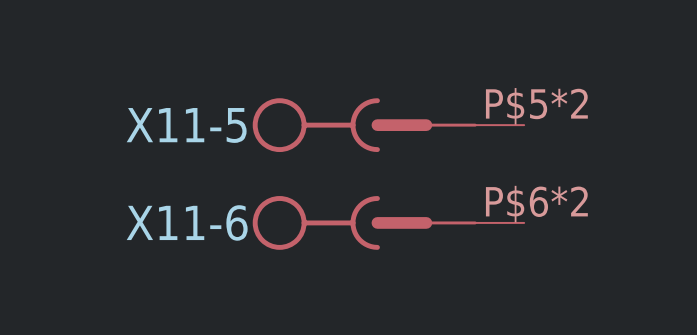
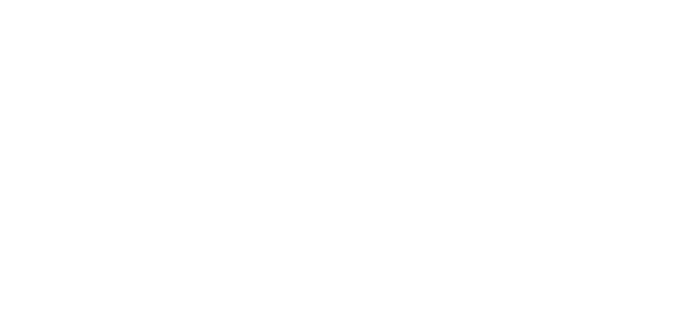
X11-5: (388, 125) -> none
X11-6: (388, 222) -> none

